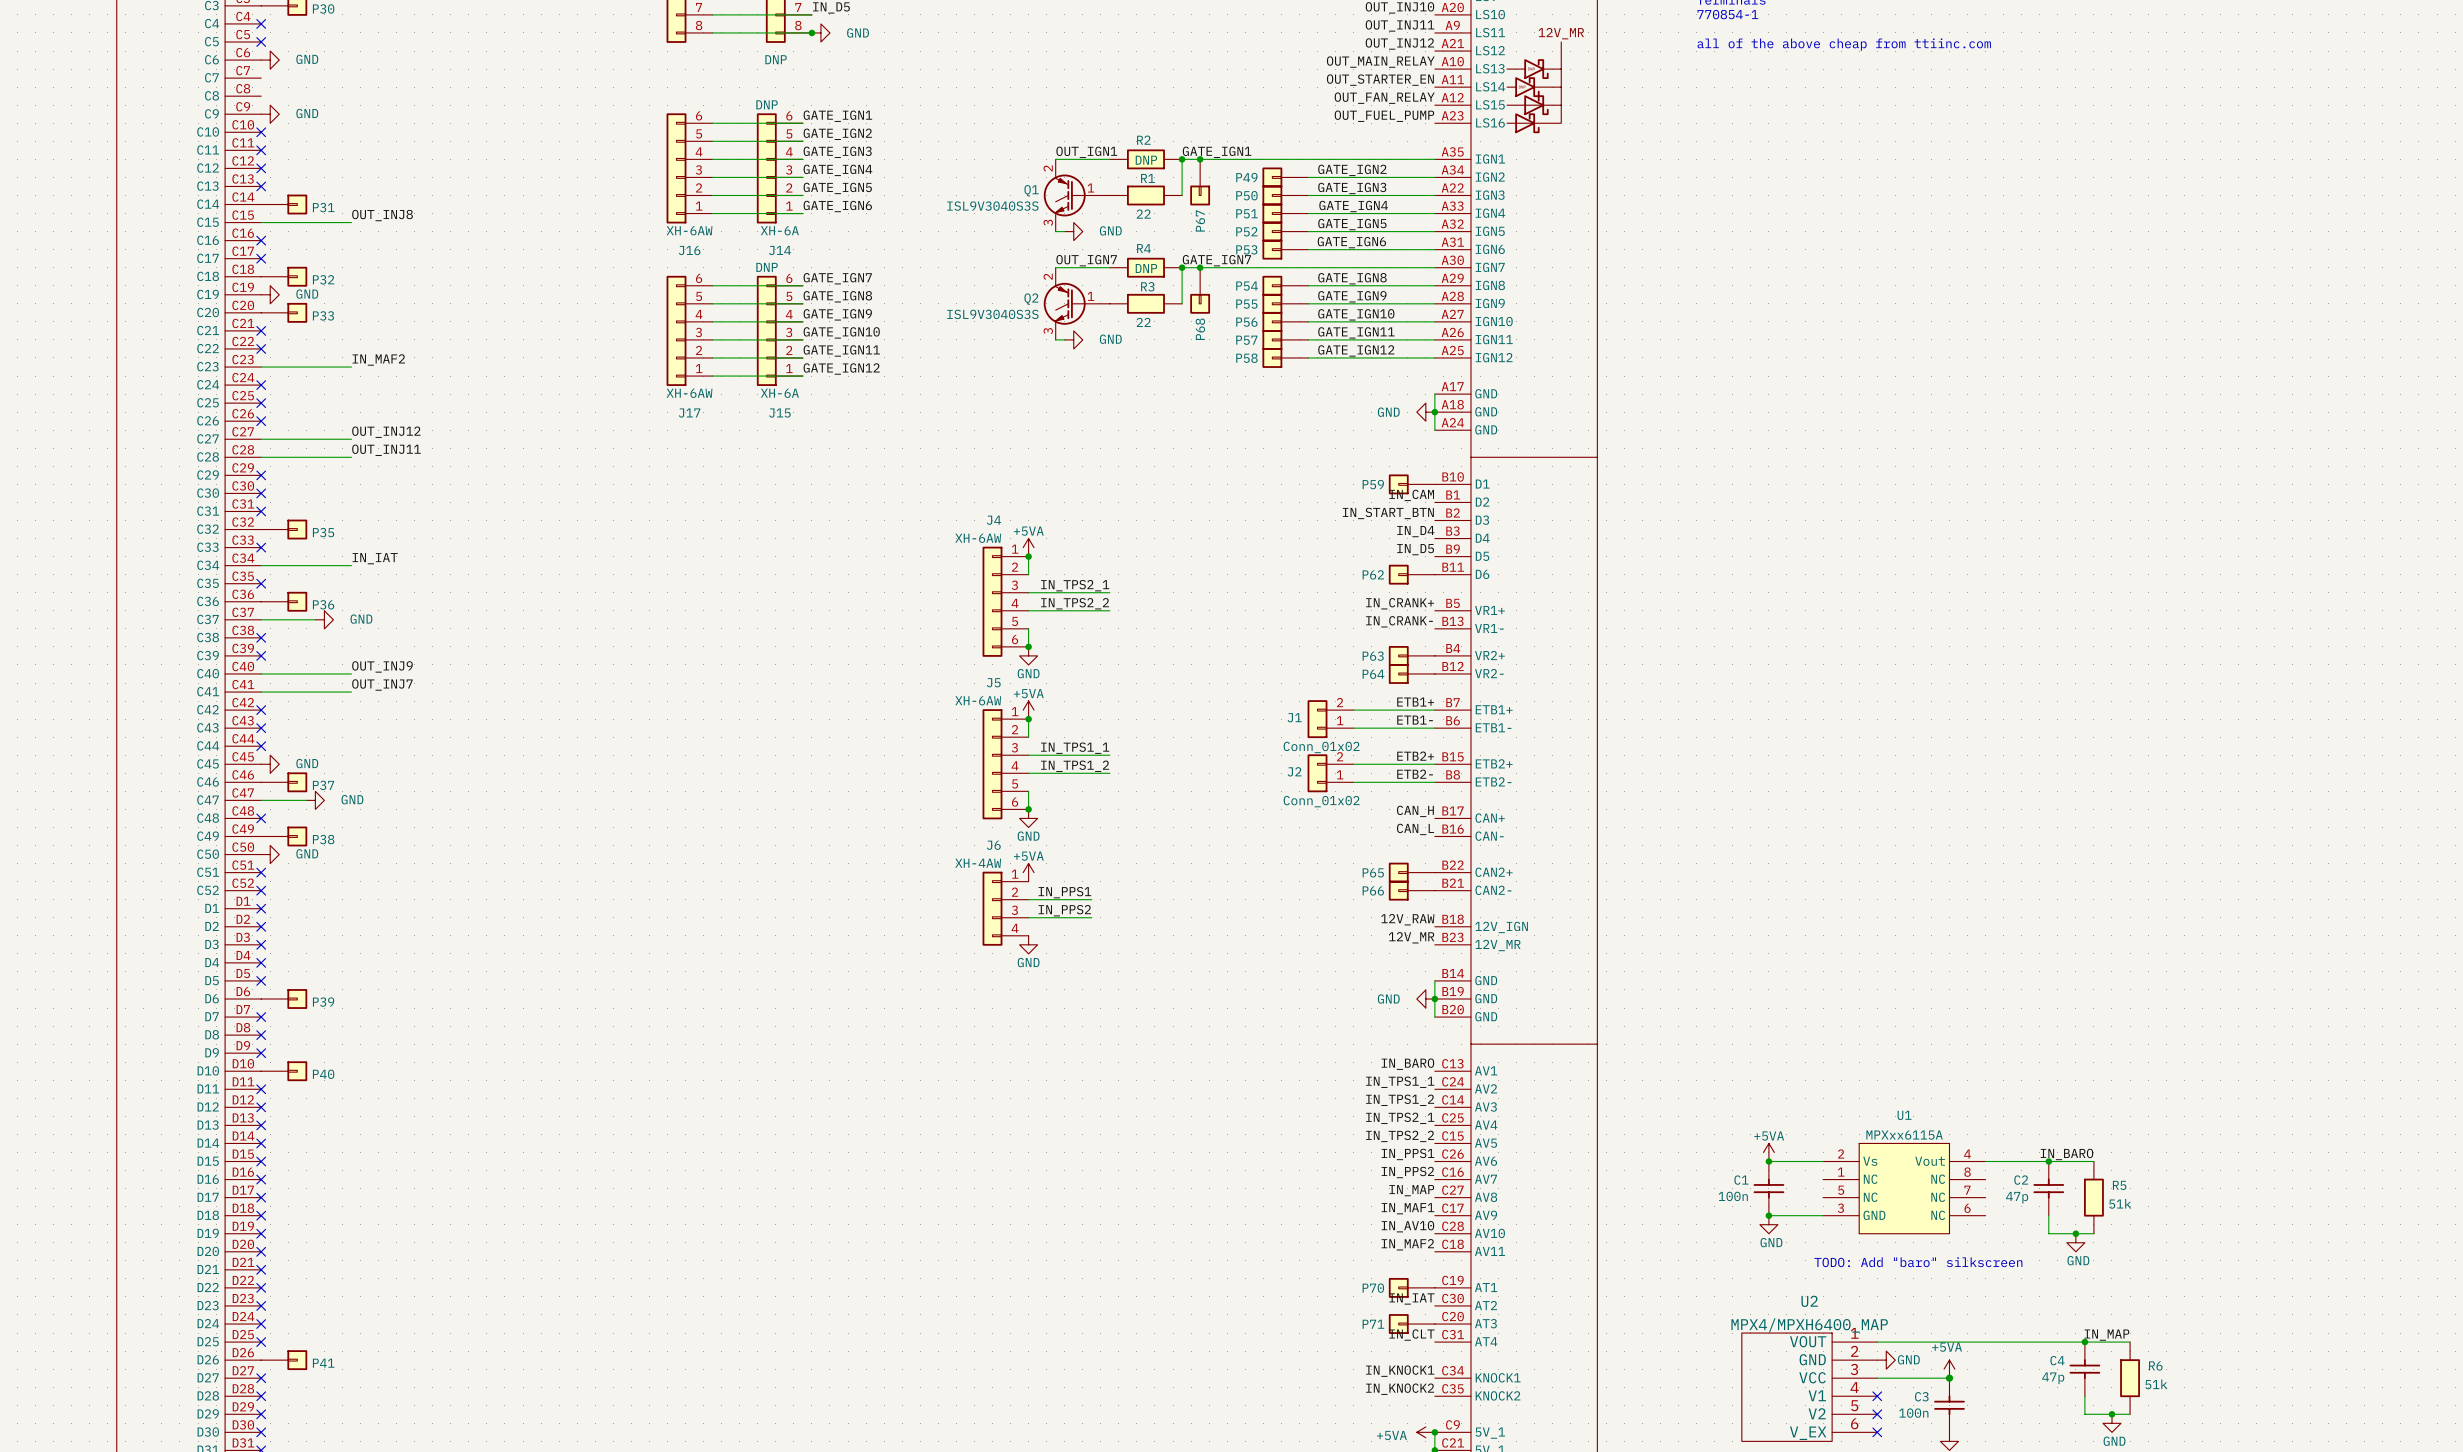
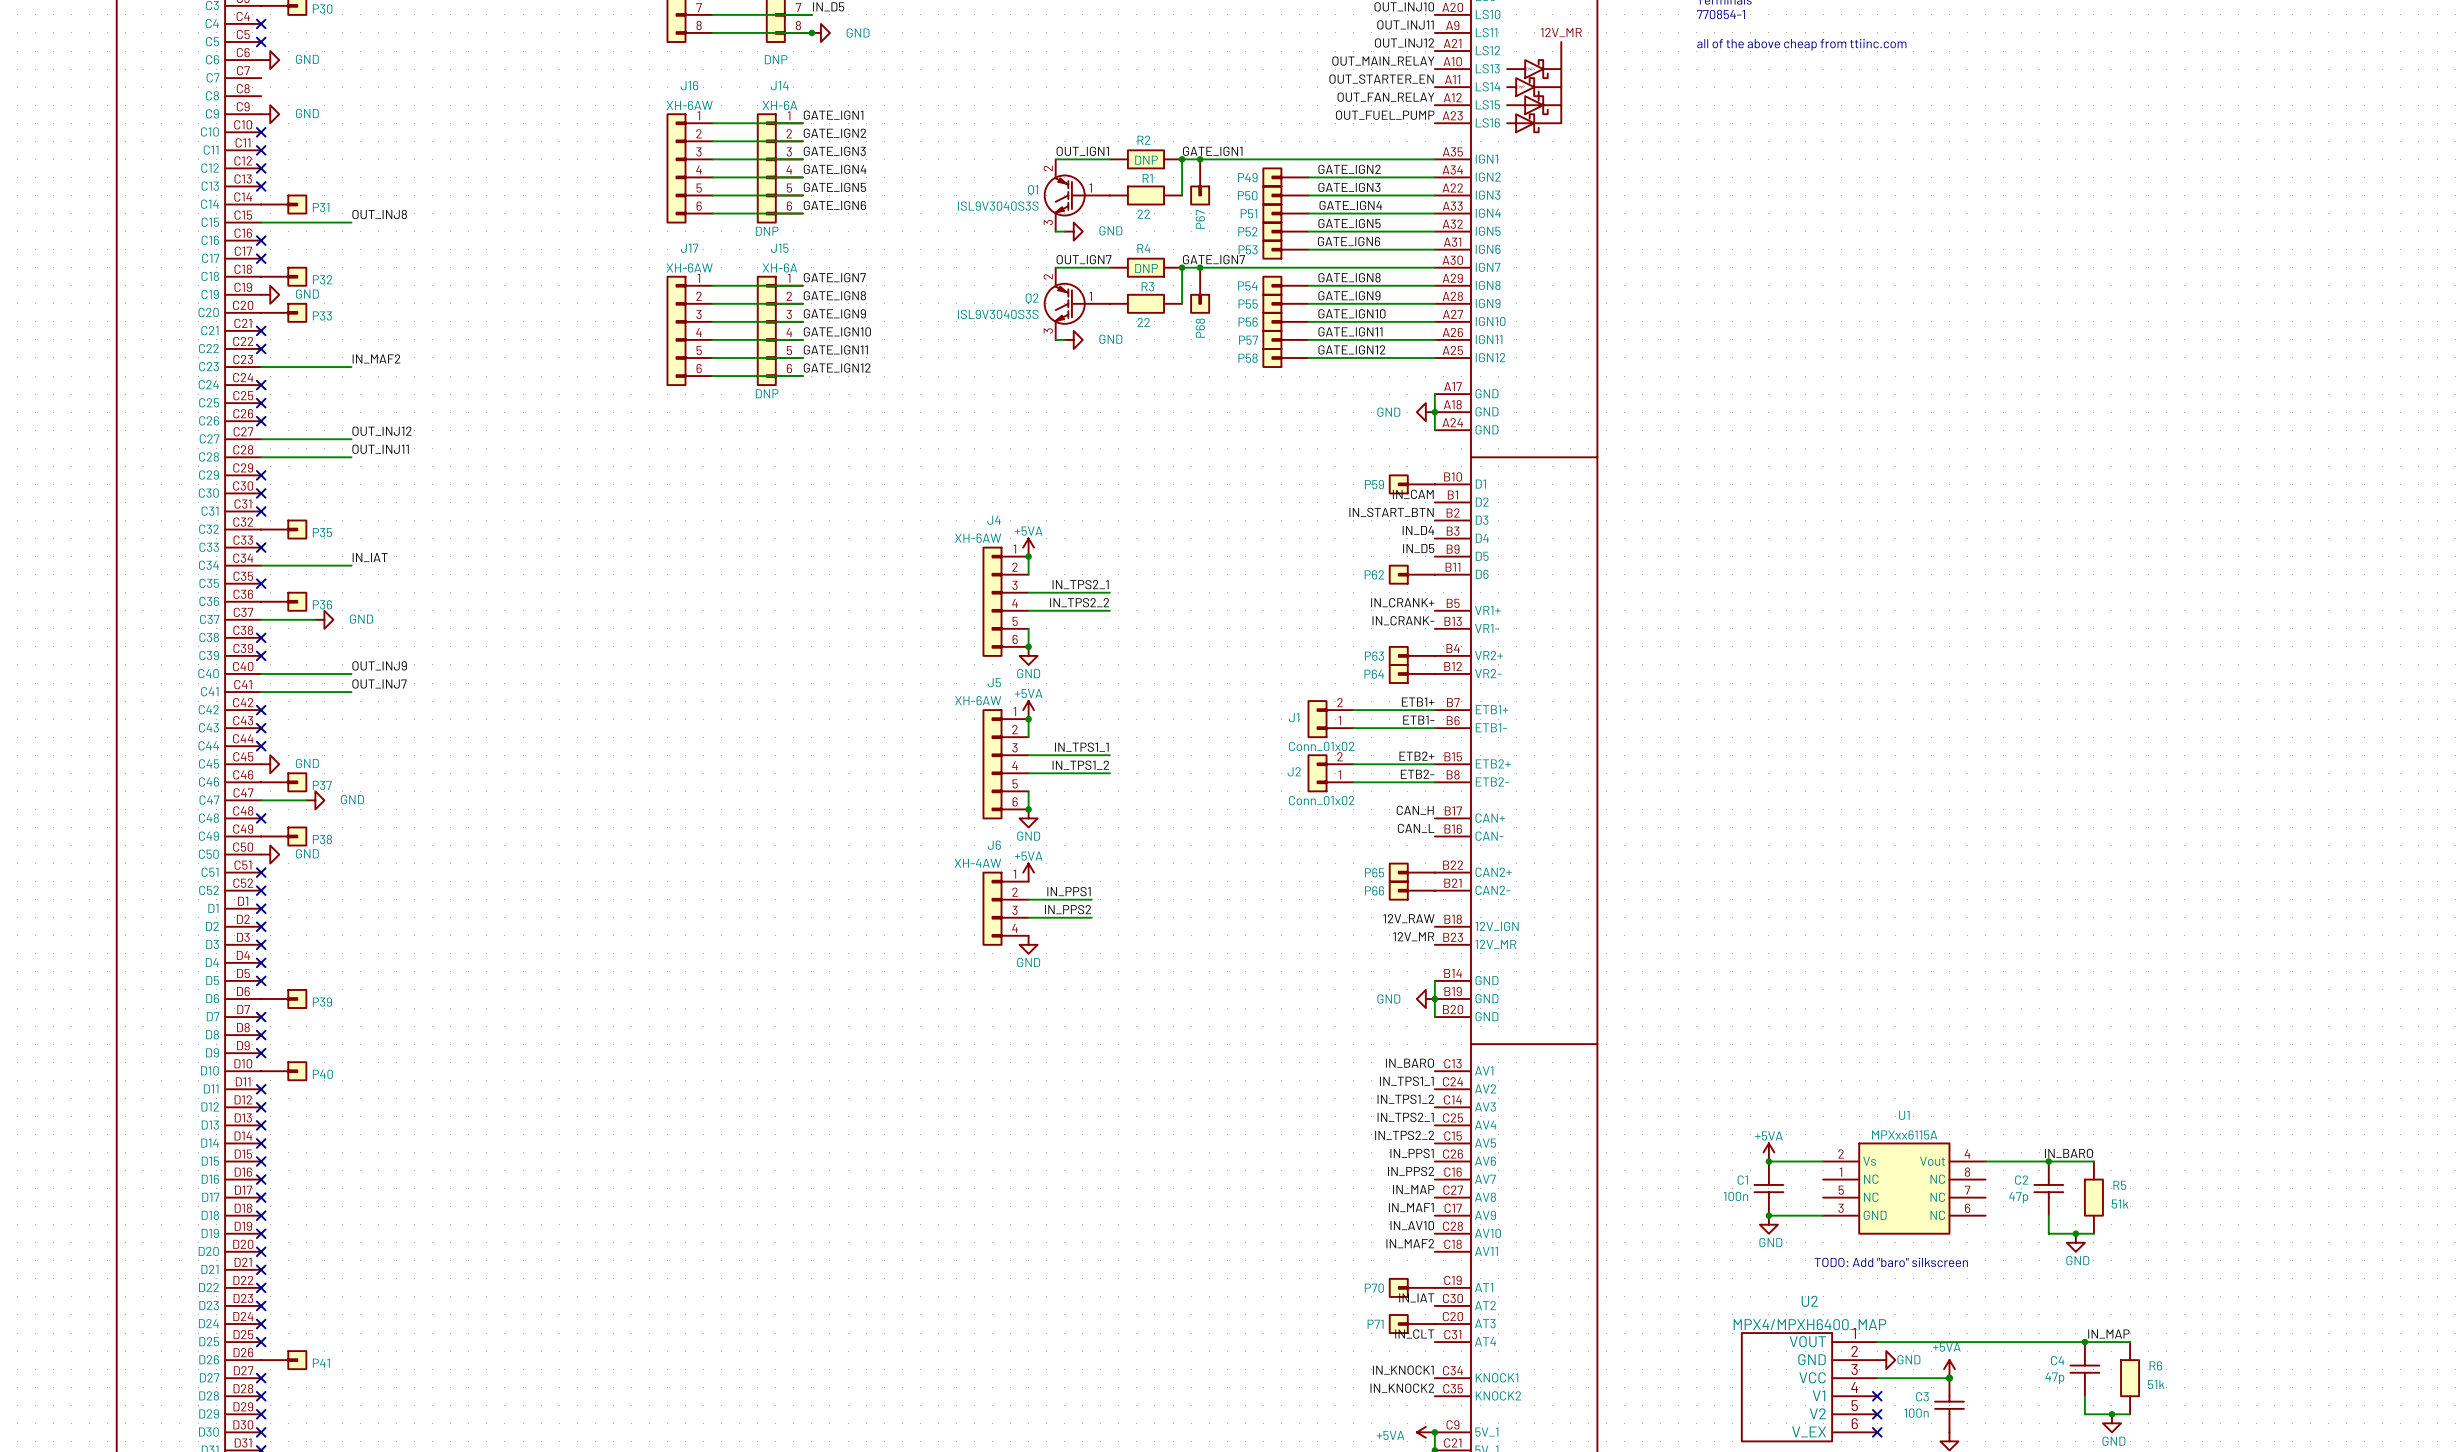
J16 flip: as is (676, 168) -> up-down (676, 168)
J14 flip: as is (766, 168) -> up-down (766, 168)
J17 flip: as is (676, 330) -> up-down (676, 330)
J15 flip: as is (766, 330) -> up-down (766, 330)

